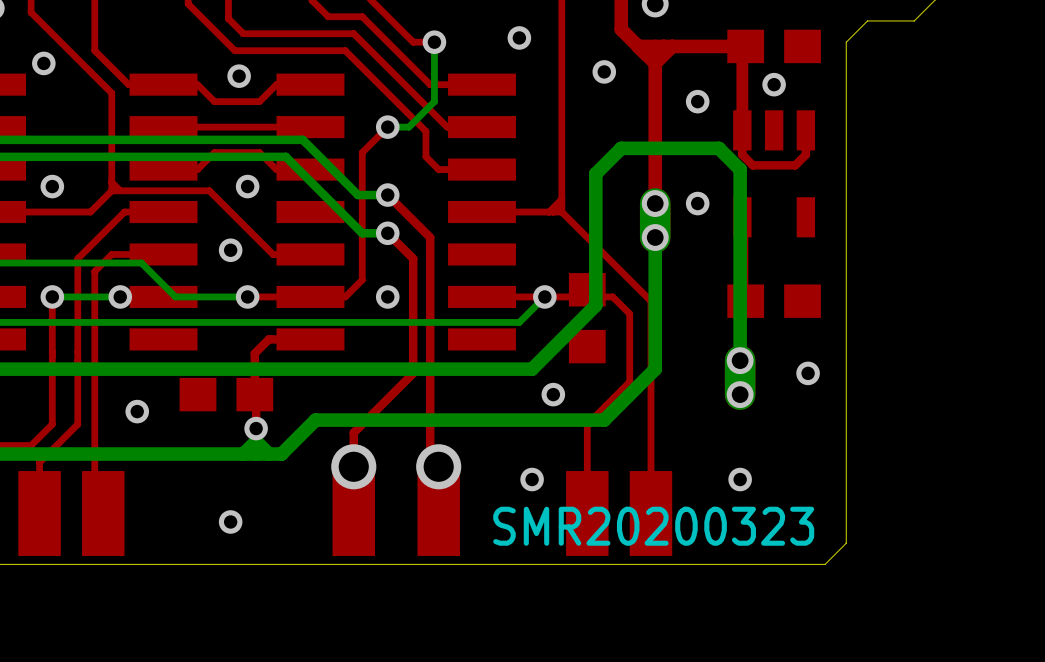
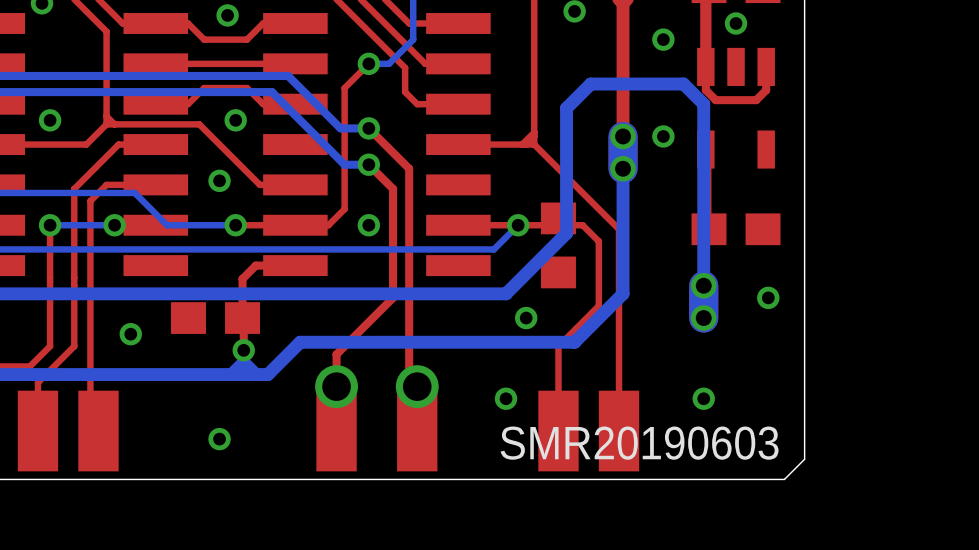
text: SMR20200323 (653, 526) -> SMR20190603 (639, 443)

